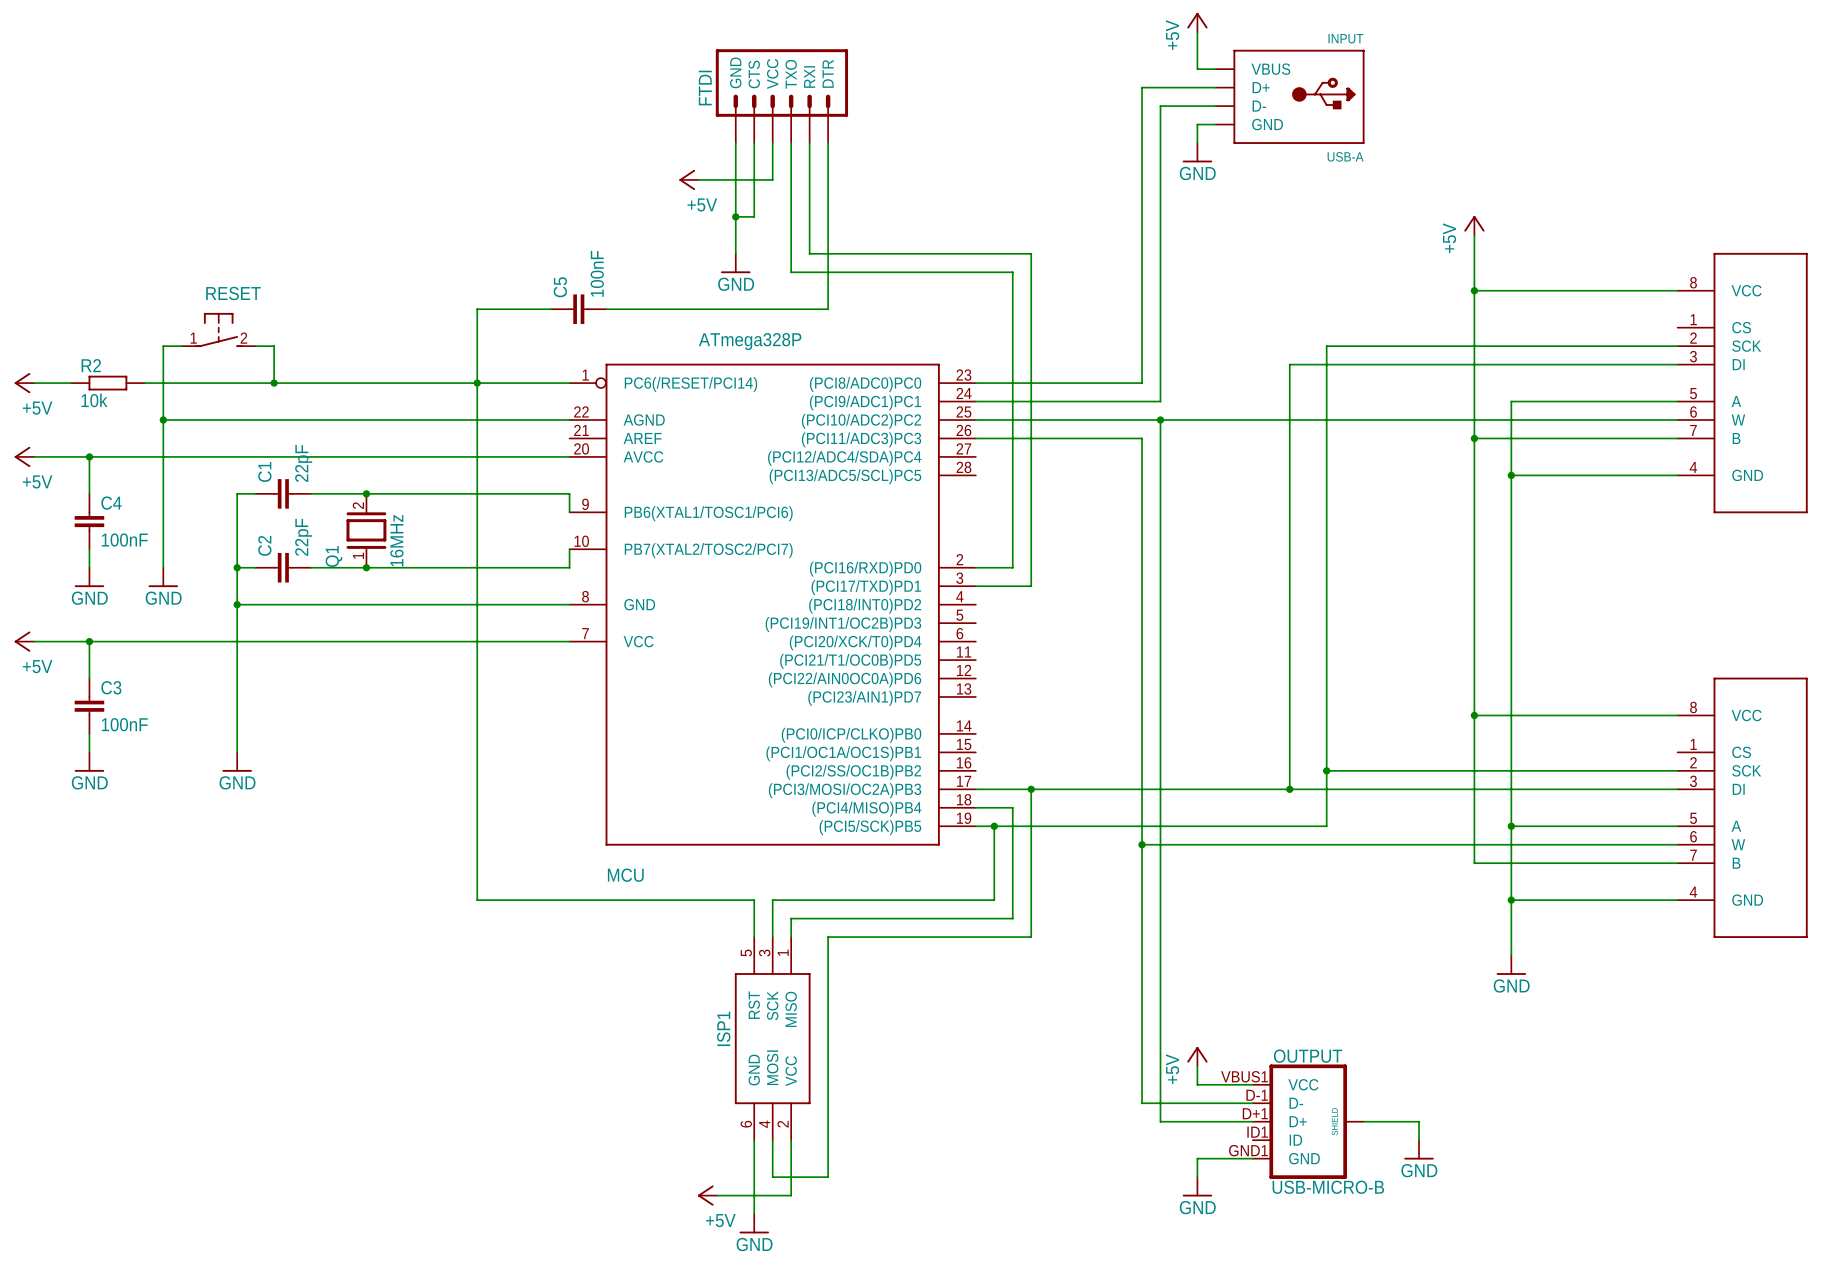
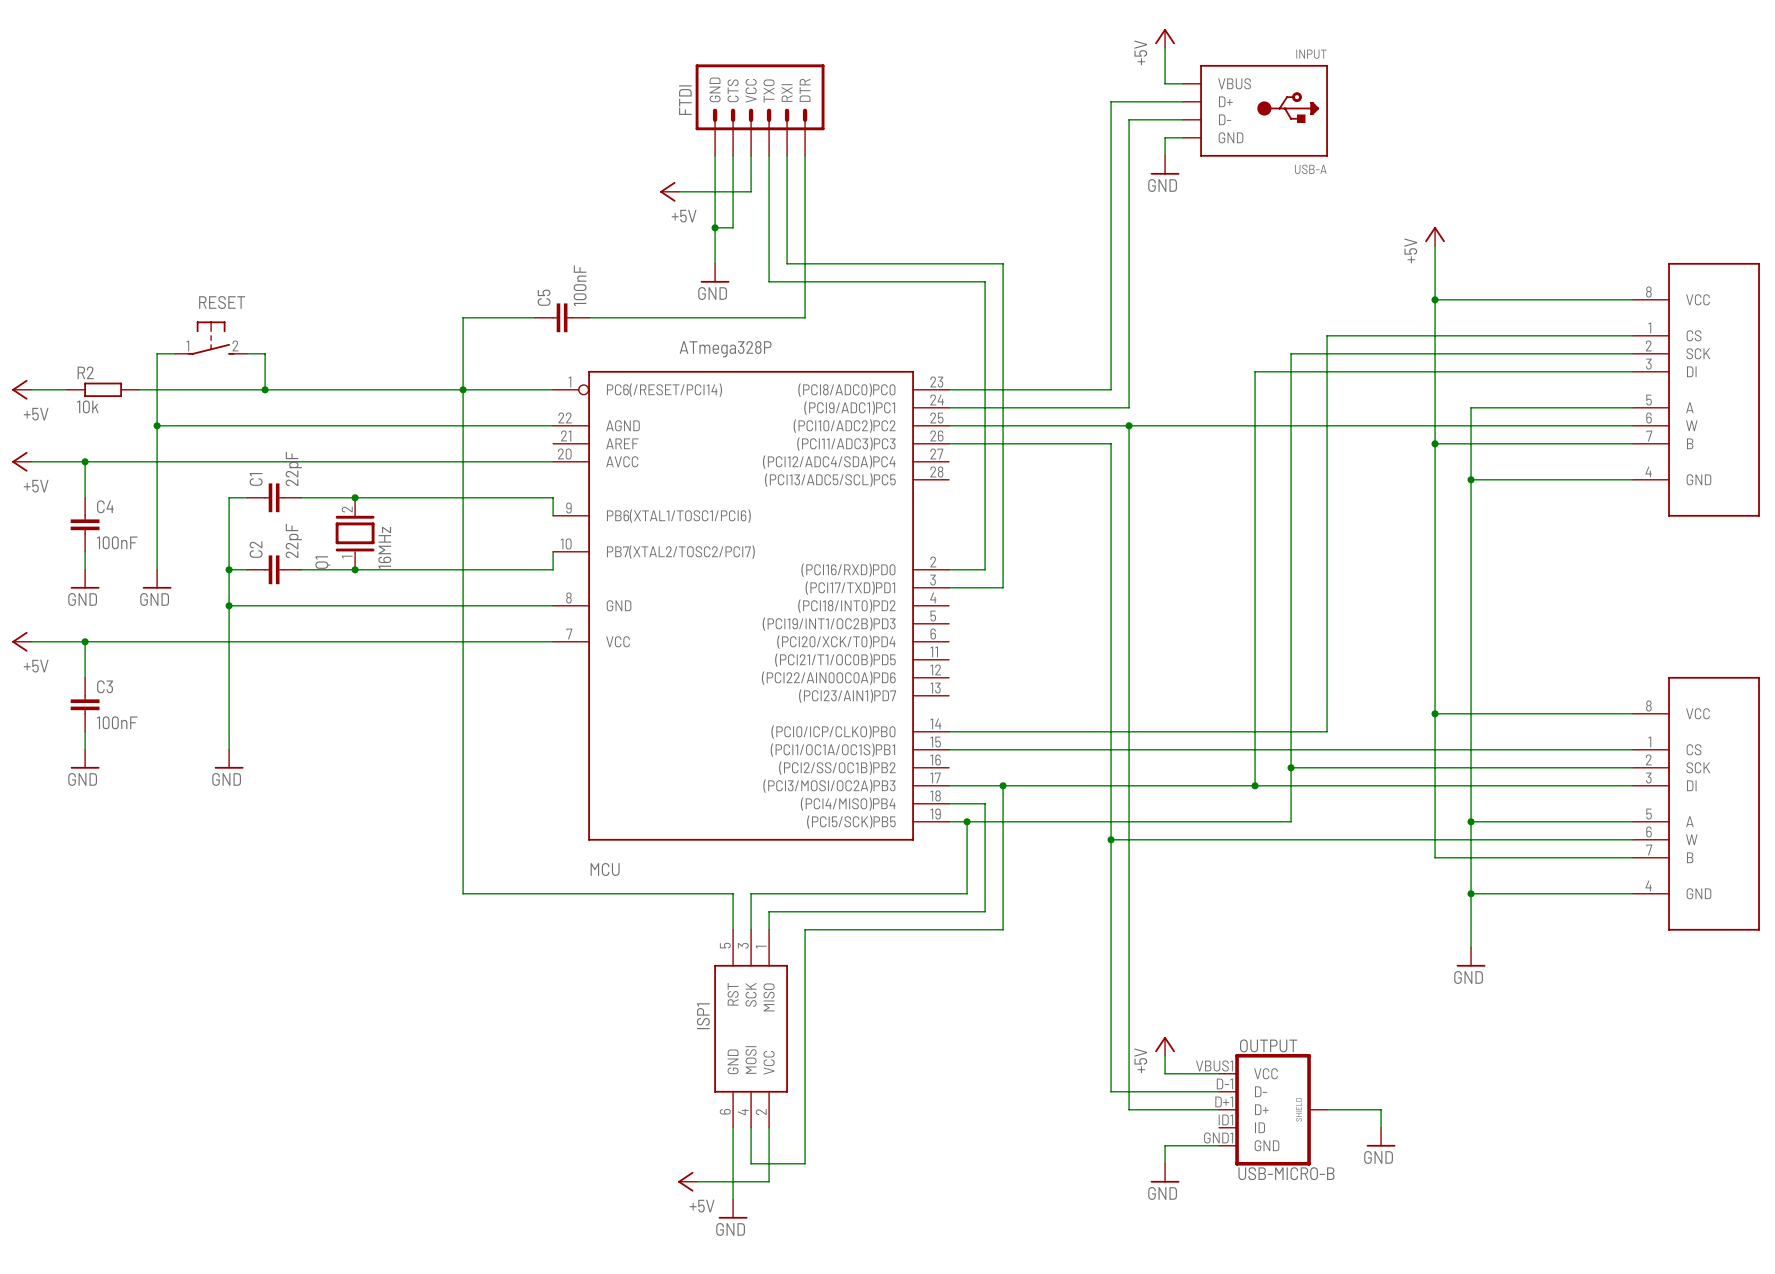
wire: none -> (1633, 335) (1327, 335) (1327, 731) (949, 731)
wire: none -> (949, 749) (1633, 749)

